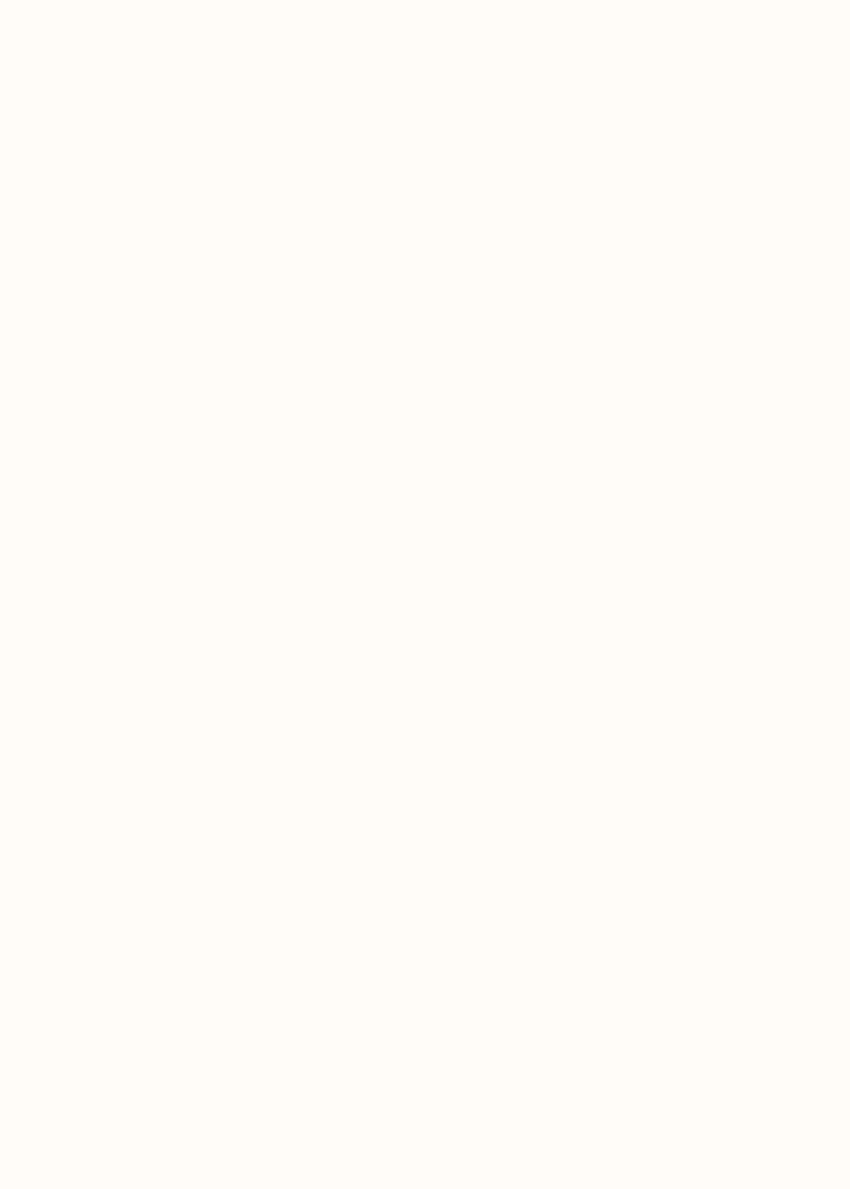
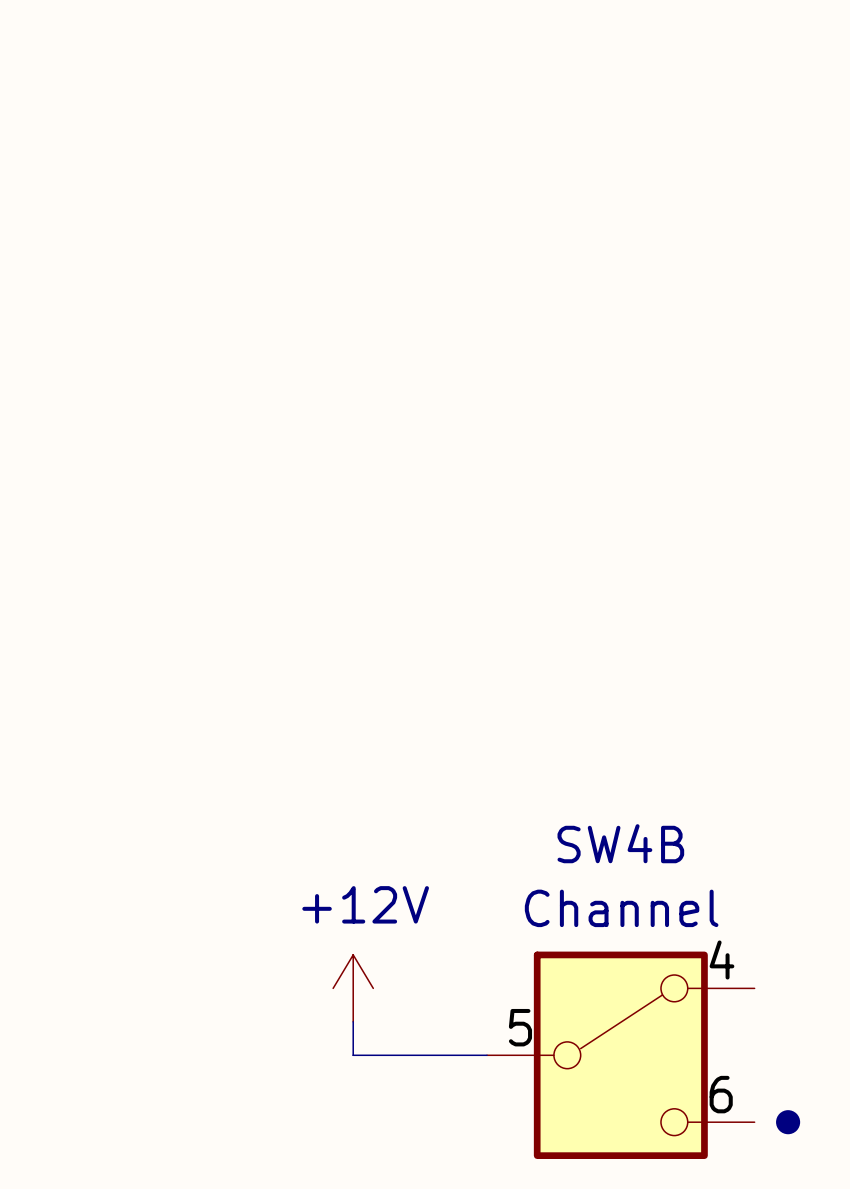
power symbol: none -> +12V (353, 988)
wire: none -> (353, 1021) (353, 1055) (487, 1055)
SW4B: none -> Channel (620, 1055)
junction: none -> (788, 1122)

